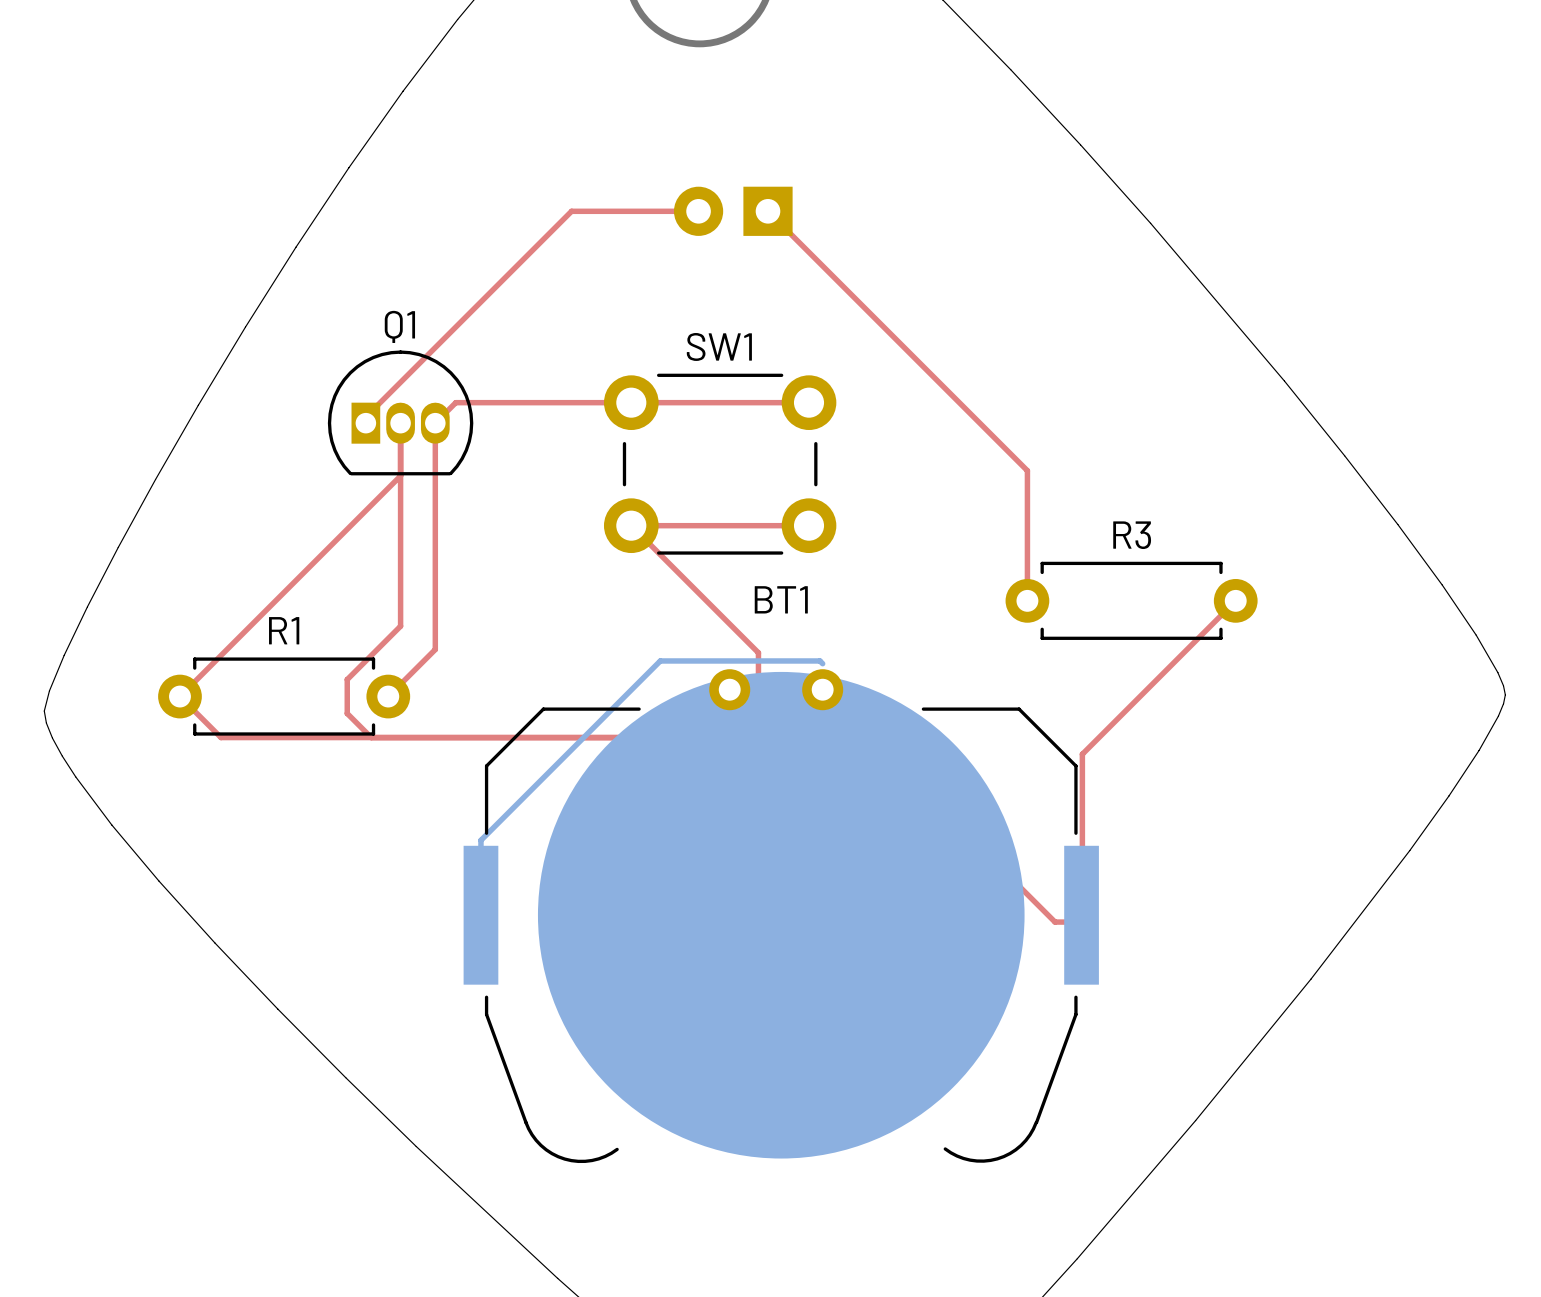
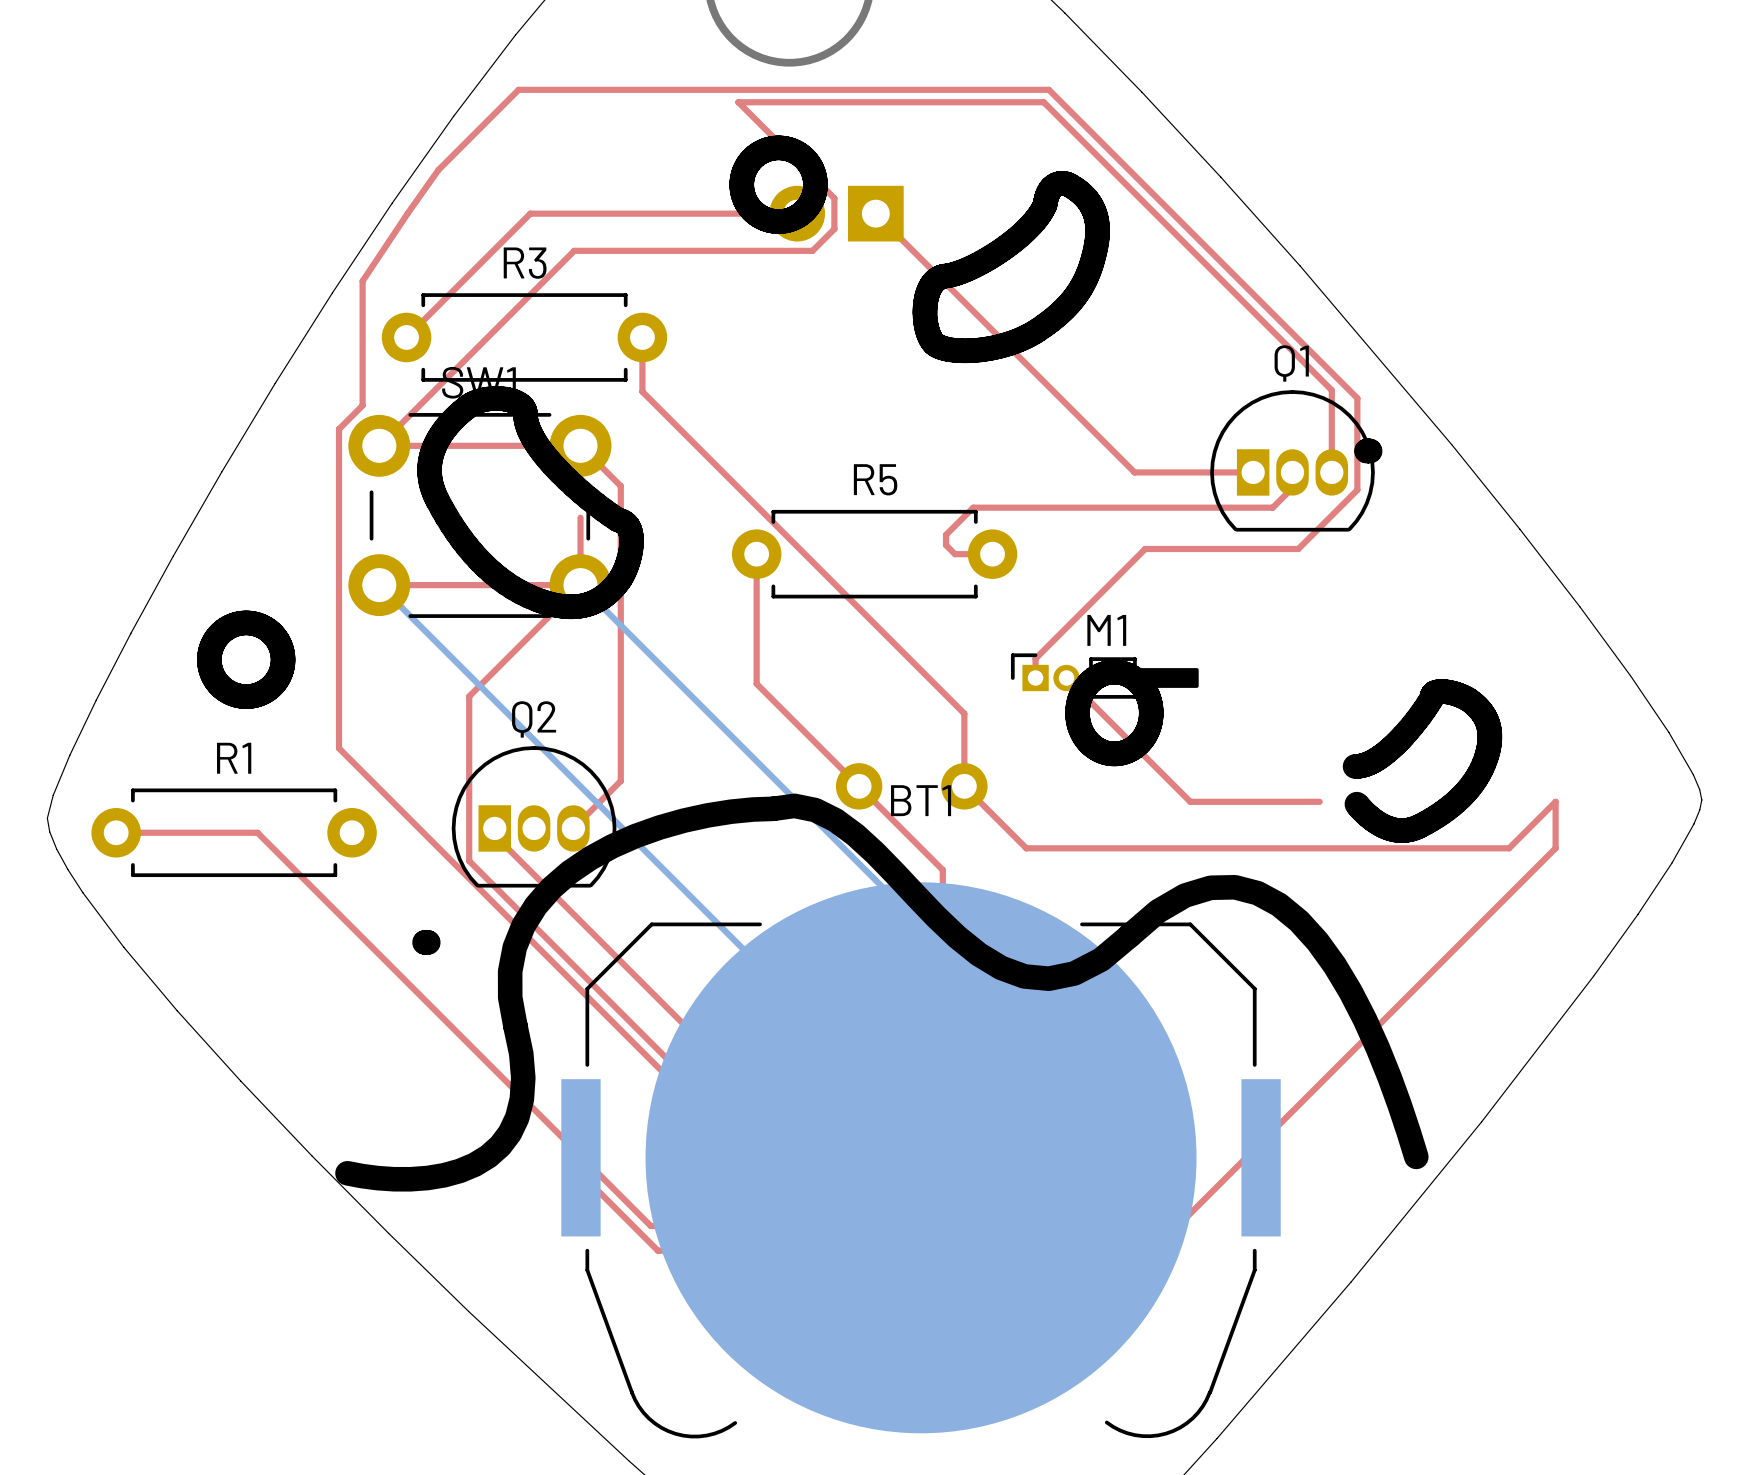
line: none -> (778, 147) (792, 150) (804, 158) (812, 170) (815, 184) (812, 199) (804, 210) (792, 218) (778, 221) (764, 218) (752, 210) (744, 199) (741, 184) (744, 170) (752, 158) (764, 150) (778, 147)
line: none -> (1051, 187) (1057, 184) (1063, 183) (1077, 190) (1090, 203) (1096, 219) (1097, 237) (1092, 260) (1085, 280) (1074, 297) (1062, 310) (1044, 325) (1028, 335) (1010, 343) (991, 348) (968, 350) (948, 349) (935, 344)
line: none -> (1050, 189) (1038, 215) (1012, 241) (977, 264) (959, 272) (940, 277) (932, 283) (927, 295) (924, 312) (927, 330) (933, 342)
top track: none -> (797, 213) (530, 213) (406, 337)
top track: none -> (875, 213) (1134, 472) (1253, 472)
top track: (698, 211) (571, 211) (365, 417) (365, 423) -> none
part position: (733, 211) -> (836, 213)
top track: (768, 211) (1027, 470) (1027, 600) -> none
top track: none -> (642, 337) (642, 391) (964, 713) (964, 786) (1026, 848) (1509, 848) (1555, 801) (1555, 848) (1153, 1250) (657, 1250) (580, 1173)
line: none -> (466, 407) (478, 401) (493, 398) (508, 399) (519, 404) (524, 410) (531, 435) (550, 462) (589, 498) (627, 525) (631, 540) (627, 562) (619, 580) (604, 595) (591, 603) (573, 606) (555, 605) (536, 599) (520, 592) (498, 577) (479, 560) (461, 539) (435, 496) (430, 482) (429, 468) (432, 453) (439, 436) (451, 421) (465, 408)
line: none -> (1370, 451) (1366, 451)
top track: (809, 402) (815, 409) (822, 409) (815, 402) (455, 402) (435, 423) (435, 649) (388, 696) -> none
top track: none -> (1292, 472) (1292, 487) (1272, 507) (973, 507) (946, 534) (946, 545) (955, 554) (992, 554)
top track: none -> (1331, 472) (1331, 390) (1043, 102) (738, 102) (834, 198) (834, 229) (812, 250) (574, 250) (379, 445) (580, 445) (620, 486) (620, 781) (573, 828)
Q1 position: (400, 412) -> (1292, 460)
top track: (400, 423) (400, 626) (347, 679) (347, 713) (371, 737) -> none
top track: none -> (580, 517) (580, 585)
SW1 position: (720, 464) -> (479, 515)
top track: (400, 475) (179, 696) (221, 737) (681, 737) (729, 689) -> none
top track: none -> (756, 554) (756, 683) (942, 870) (942, 1215) (932, 1225) (650, 1225) (257, 832) (116, 832)
R5: none -> (874, 554)
bottom track: none -> (379, 585) (921, 1126)
top track: none -> (580, 585) (379, 585)
top track: none -> (580, 585) (469, 696) (469, 860) (796, 1188) (905, 1188)
bottom track: none -> (580, 585) (921, 925) (921, 1157)
top track: (809, 525) (631, 525) (758, 652) (758, 890) (685, 963) -> none
line: none -> (248, 622) (262, 626) (273, 634) (280, 647) (283, 661) (279, 675) (271, 687) (258, 694) (244, 696) (230, 692) (218, 684) (211, 672) (209, 657) (213, 643) (221, 632) (233, 625) (248, 622)
line: none -> (1118, 672) (1131, 676) (1142, 686) (1149, 700) (1151, 715) (1147, 731) (1138, 743) (1126, 751) (1112, 753) (1098, 750) (1087, 740) (1079, 727) (1077, 710) (1081, 694) (1089, 682) (1103, 673) (1118, 672)
M1: none -> (1104, 676)
top track: none -> (1035, 677) (1035, 658) (1145, 549) (1298, 549) (1357, 490) (1357, 398) (1048, 89) (518, 89) (438, 169) (362, 281) (362, 405) (339, 429) (339, 748) (791, 1201) (910, 1201) (917, 1193) (917, 1183) (910, 1176) (835, 1176) (494, 835) (494, 828)
top track: none -> (1066, 677) (1190, 801) (1319, 801)
line: none -> (1438, 691) (1451, 692) (1467, 699) (1479, 709) (1487, 722) (1489, 734) (1488, 749) (1481, 768) (1472, 783) (1461, 797) (1442, 812) (1420, 825) (1408, 829) (1395, 830) (1383, 826) (1370, 817) (1356, 804)
R3 position: (1131, 600) -> (524, 337)
top track: (1235, 600) (1082, 754) (1082, 922) (1055, 922) (822, 689) -> none
line: none -> (1432, 696) (1416, 719) (1391, 747) (1372, 761) (1355, 766)
bottom track: (822, 663) (819, 660) (660, 660) (480, 840) (480, 915) -> none
part position: (776, 689) -> (911, 786)
R1 position: (284, 696) -> (234, 832)
Q2: none -> (534, 816)
line: none -> (428, 942) (424, 942)
BT1 position: (781, 917) -> (921, 1160)
line: none -> (1416, 1156) (1389, 1077) (1364, 1019) (1350, 991) (1317, 941) (1299, 921) (1279, 904) (1257, 893) (1234, 887) (1210, 887) (1185, 895) (1158, 911) (1101, 959) (1074, 973) (1048, 978) (1024, 976) (1001, 967) (978, 954) (957, 936) (855, 834) (835, 820) (815, 810) (794, 805) (707, 815) (659, 827) (612, 846) (569, 872) (551, 888) (535, 905) (523, 925) (514, 947) (510, 971) (510, 997) (521, 1053) (523, 1078) (521, 1099) (517, 1117) (509, 1133) (500, 1145) (488, 1156) (474, 1164) (444, 1175) (393, 1179) (347, 1173)

